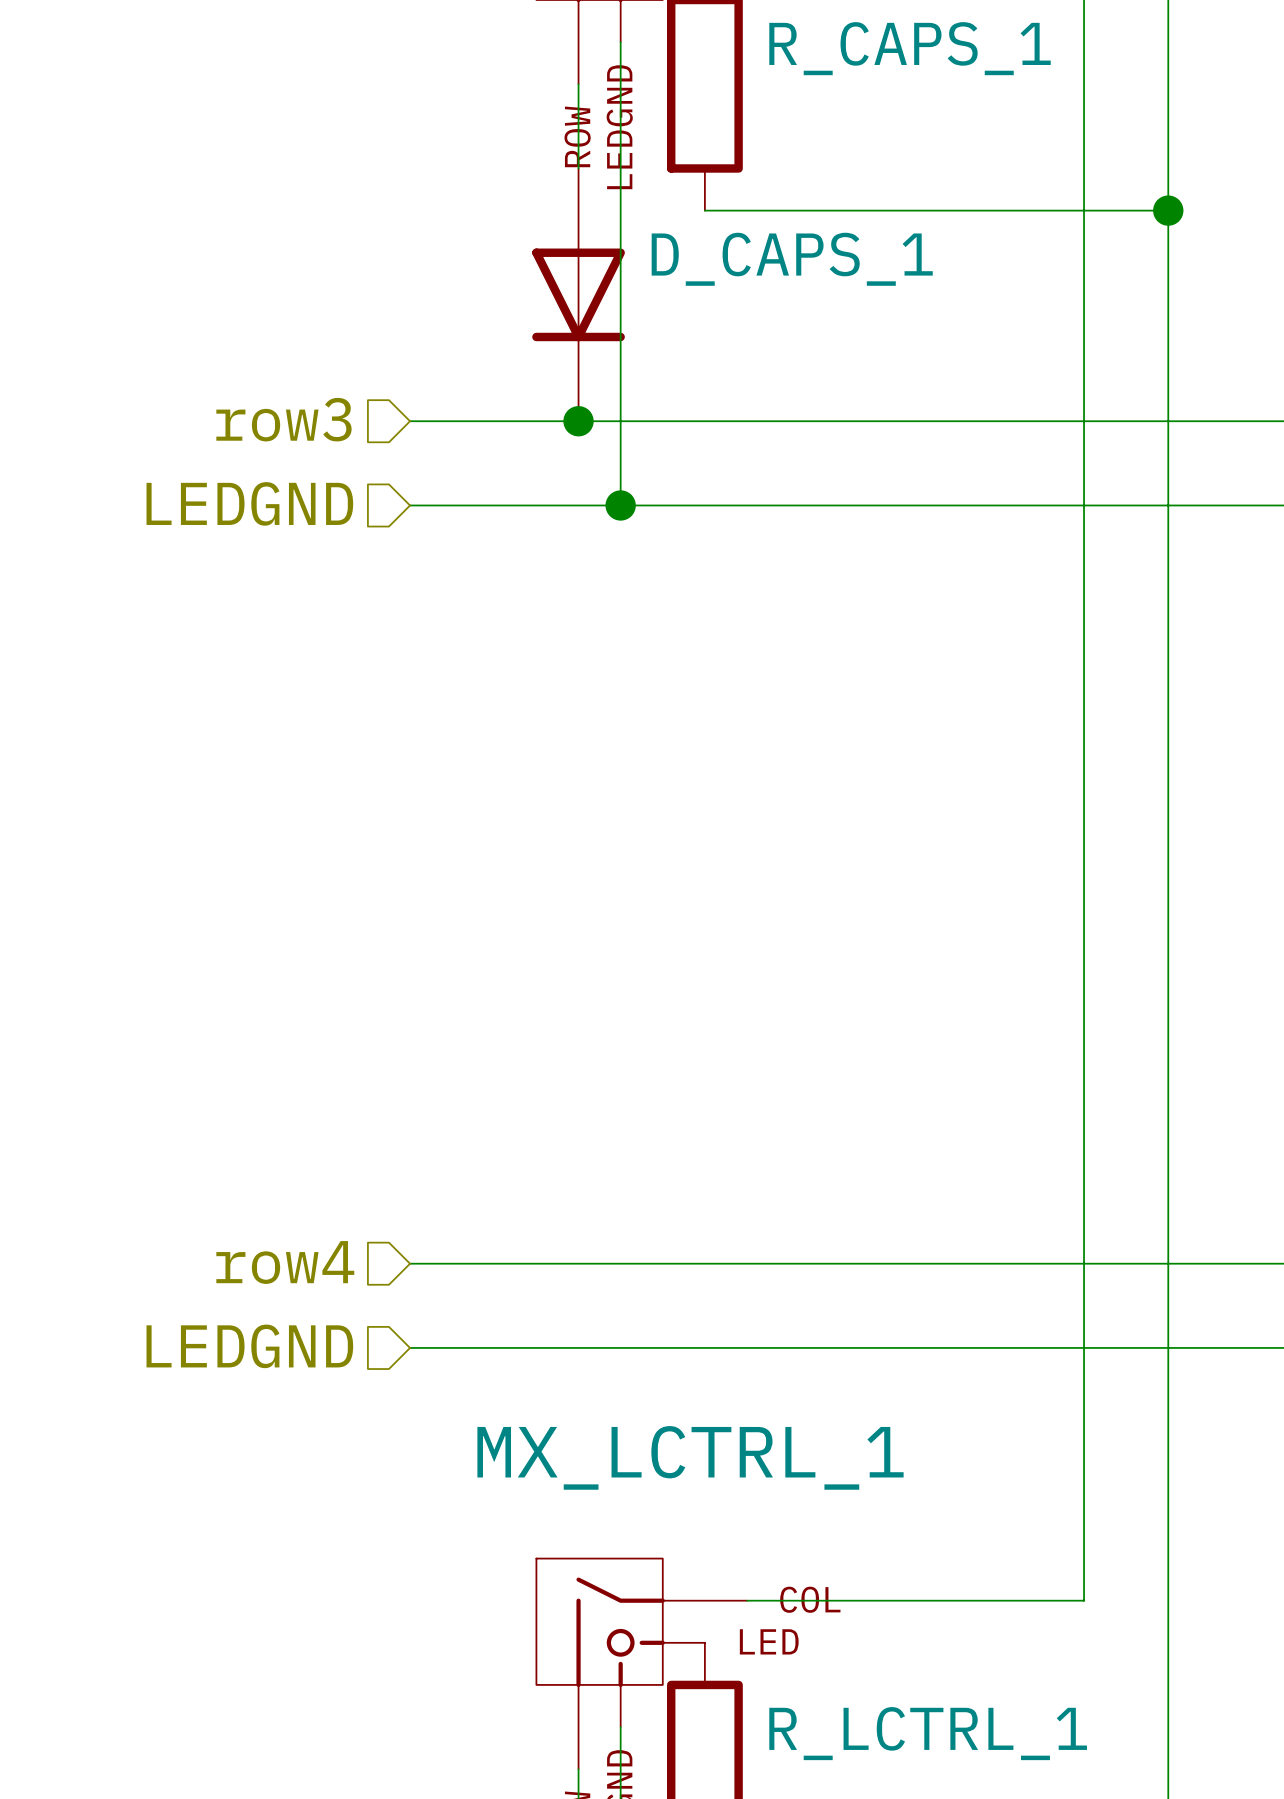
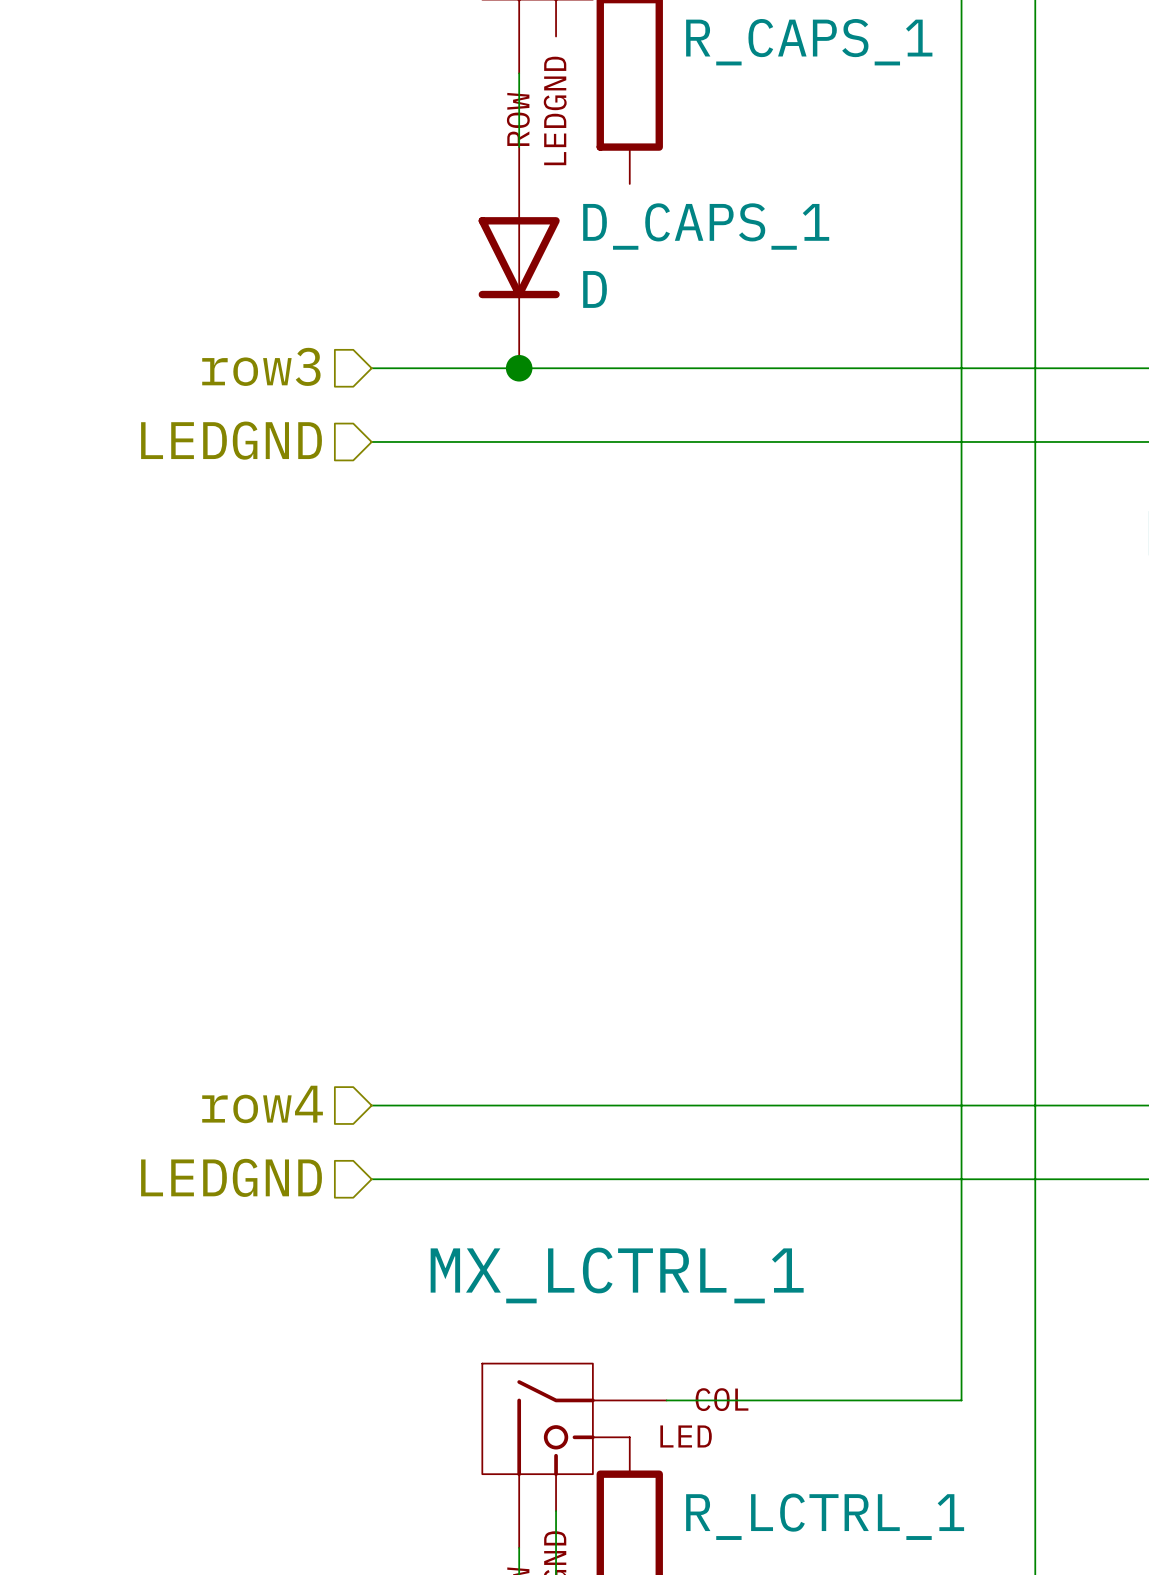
wire: (620, 42) (620, 505) -> none
wire: (704, 210) (1168, 210) -> none
junction: (1168, 210) -> none
D_CAPS_1 value: none -> D (595, 289)
junction: (620, 505) -> none

